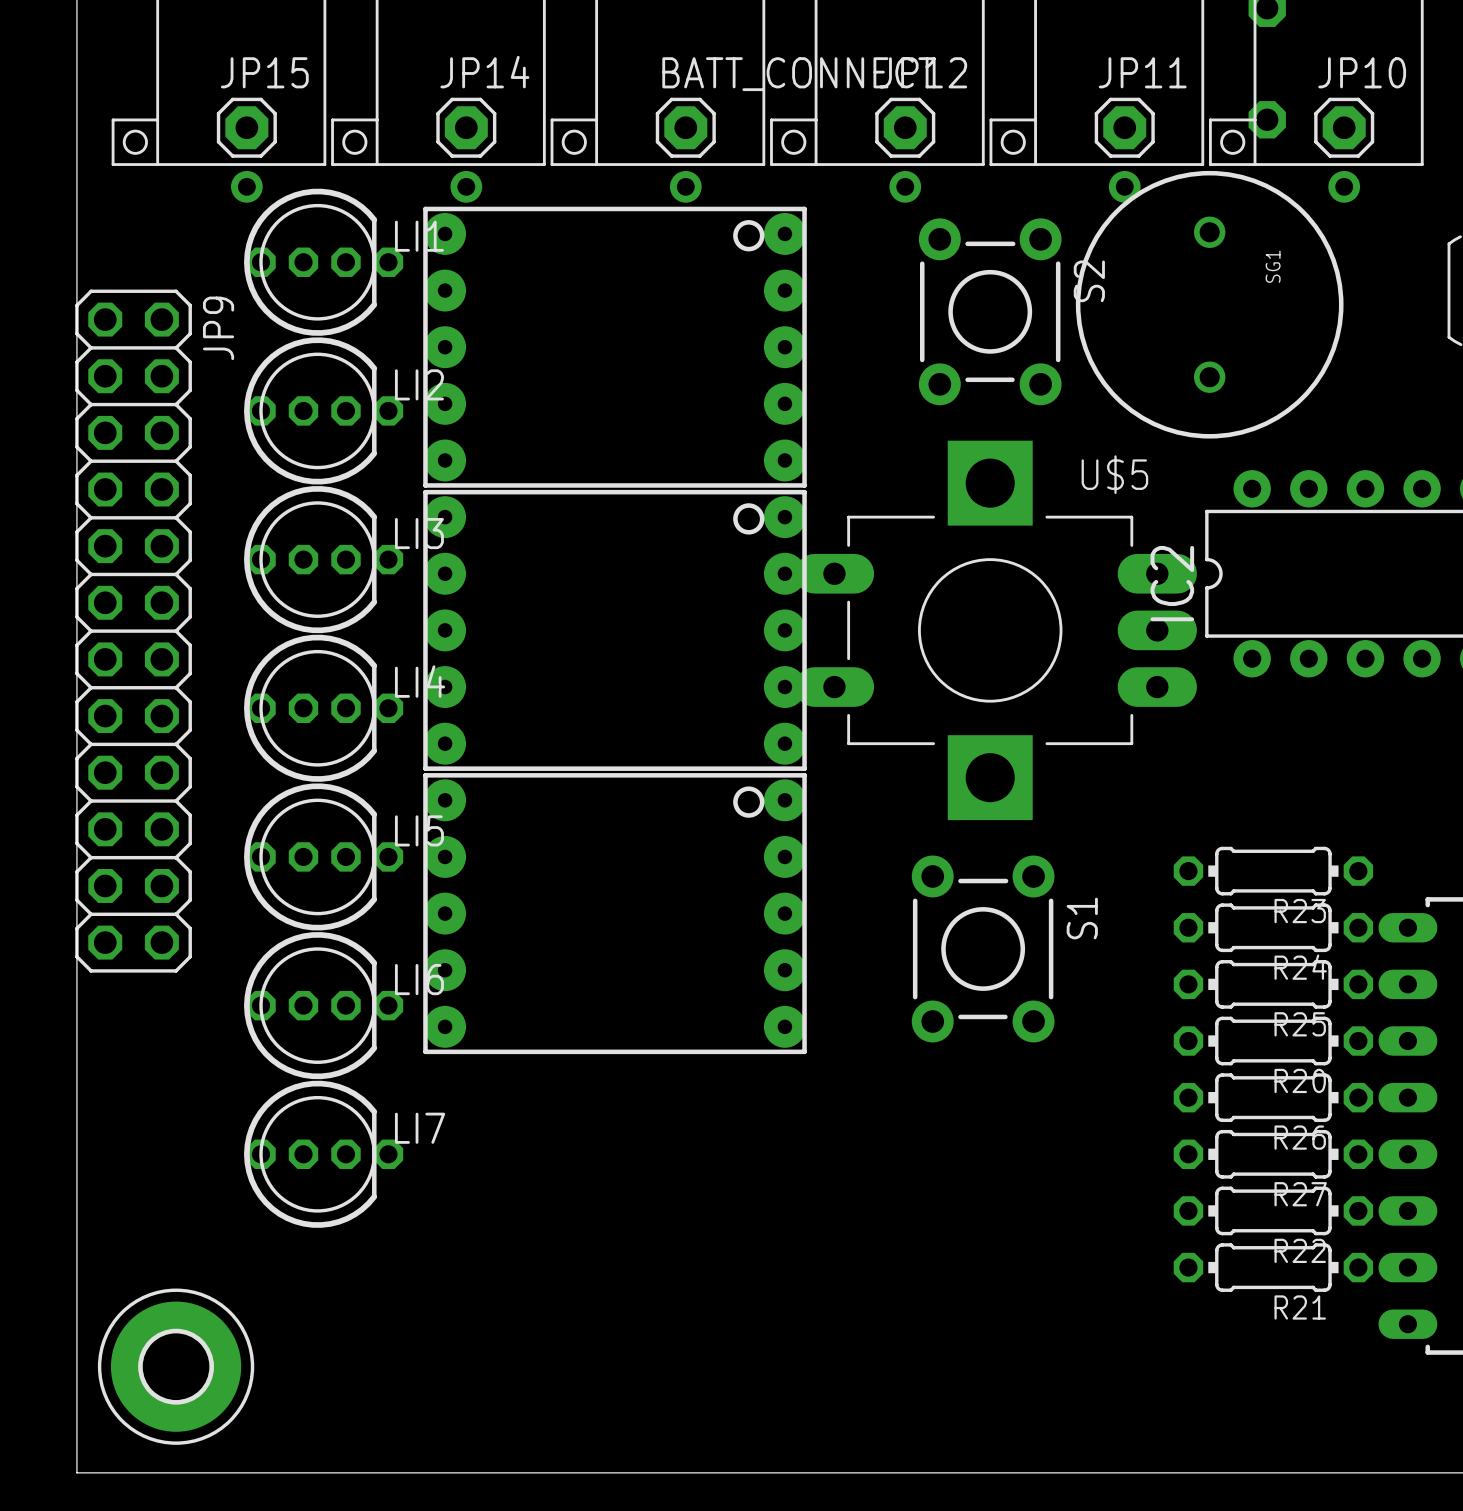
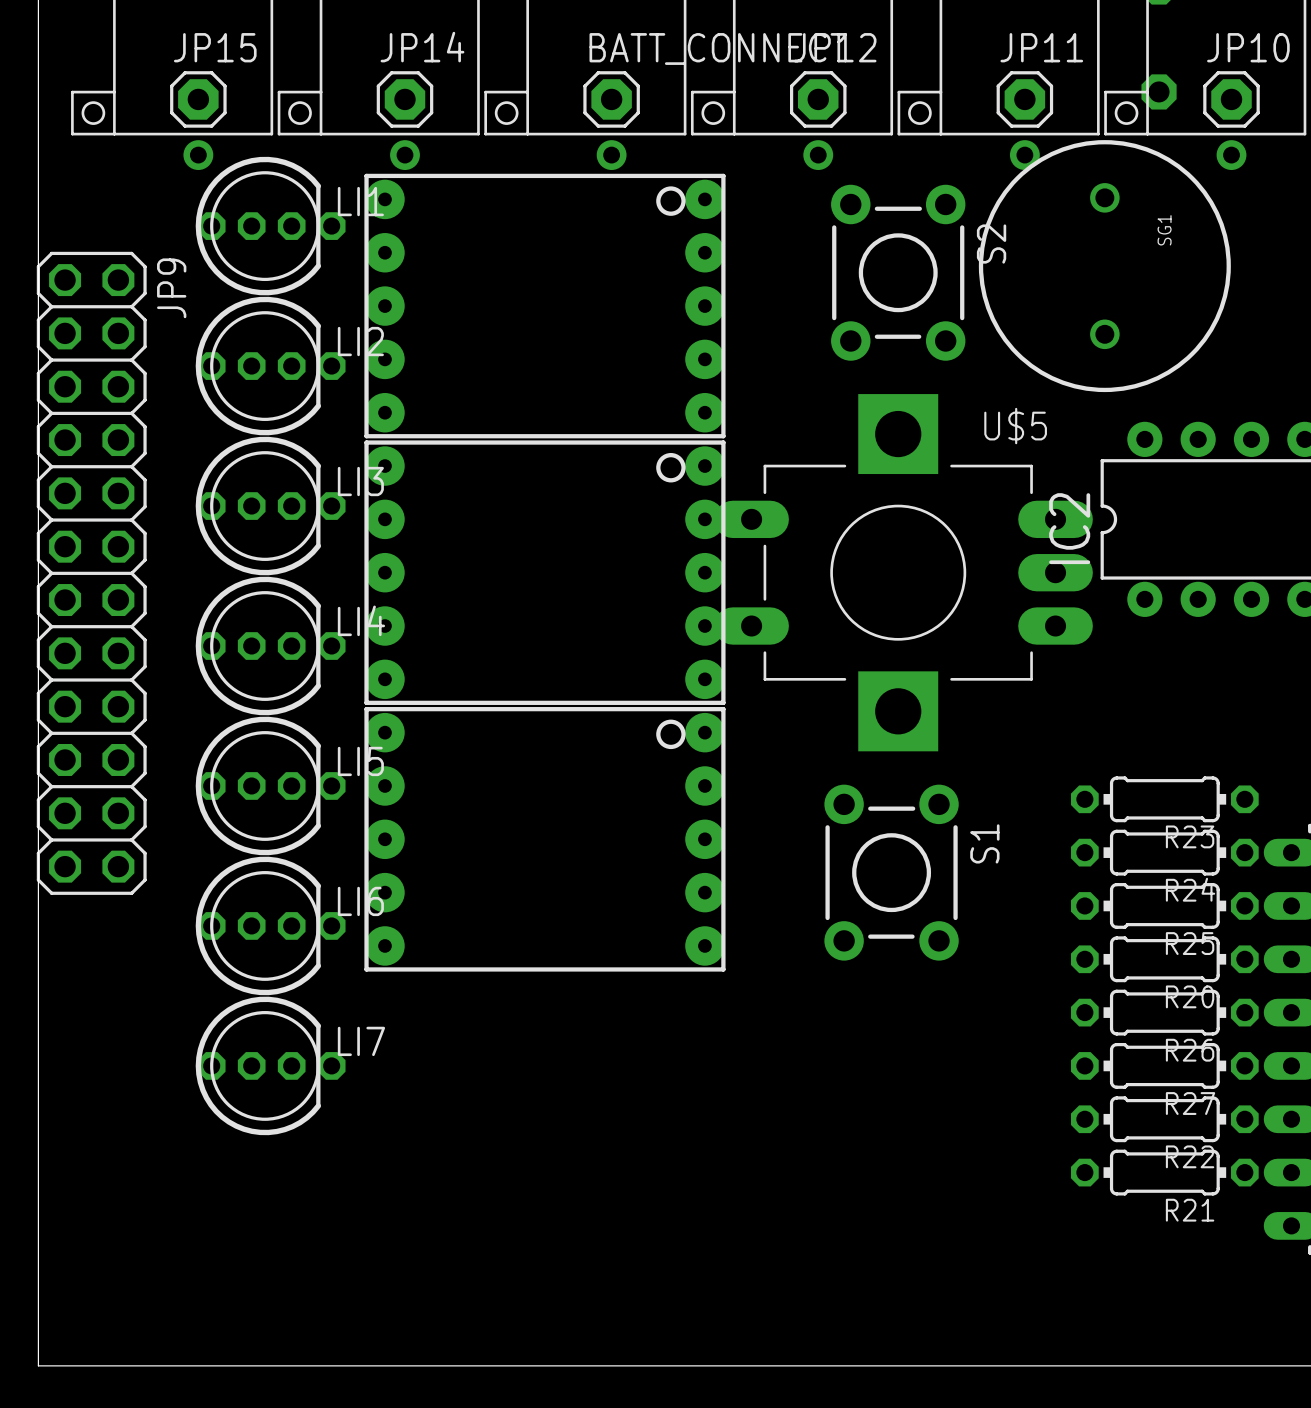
part: (176, 1366) -> none

